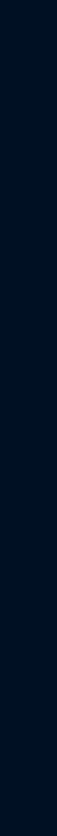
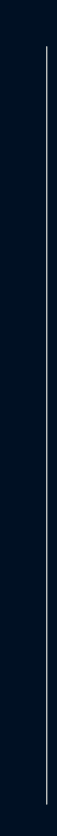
board edge: none -> (46, 46) (46, 804)

